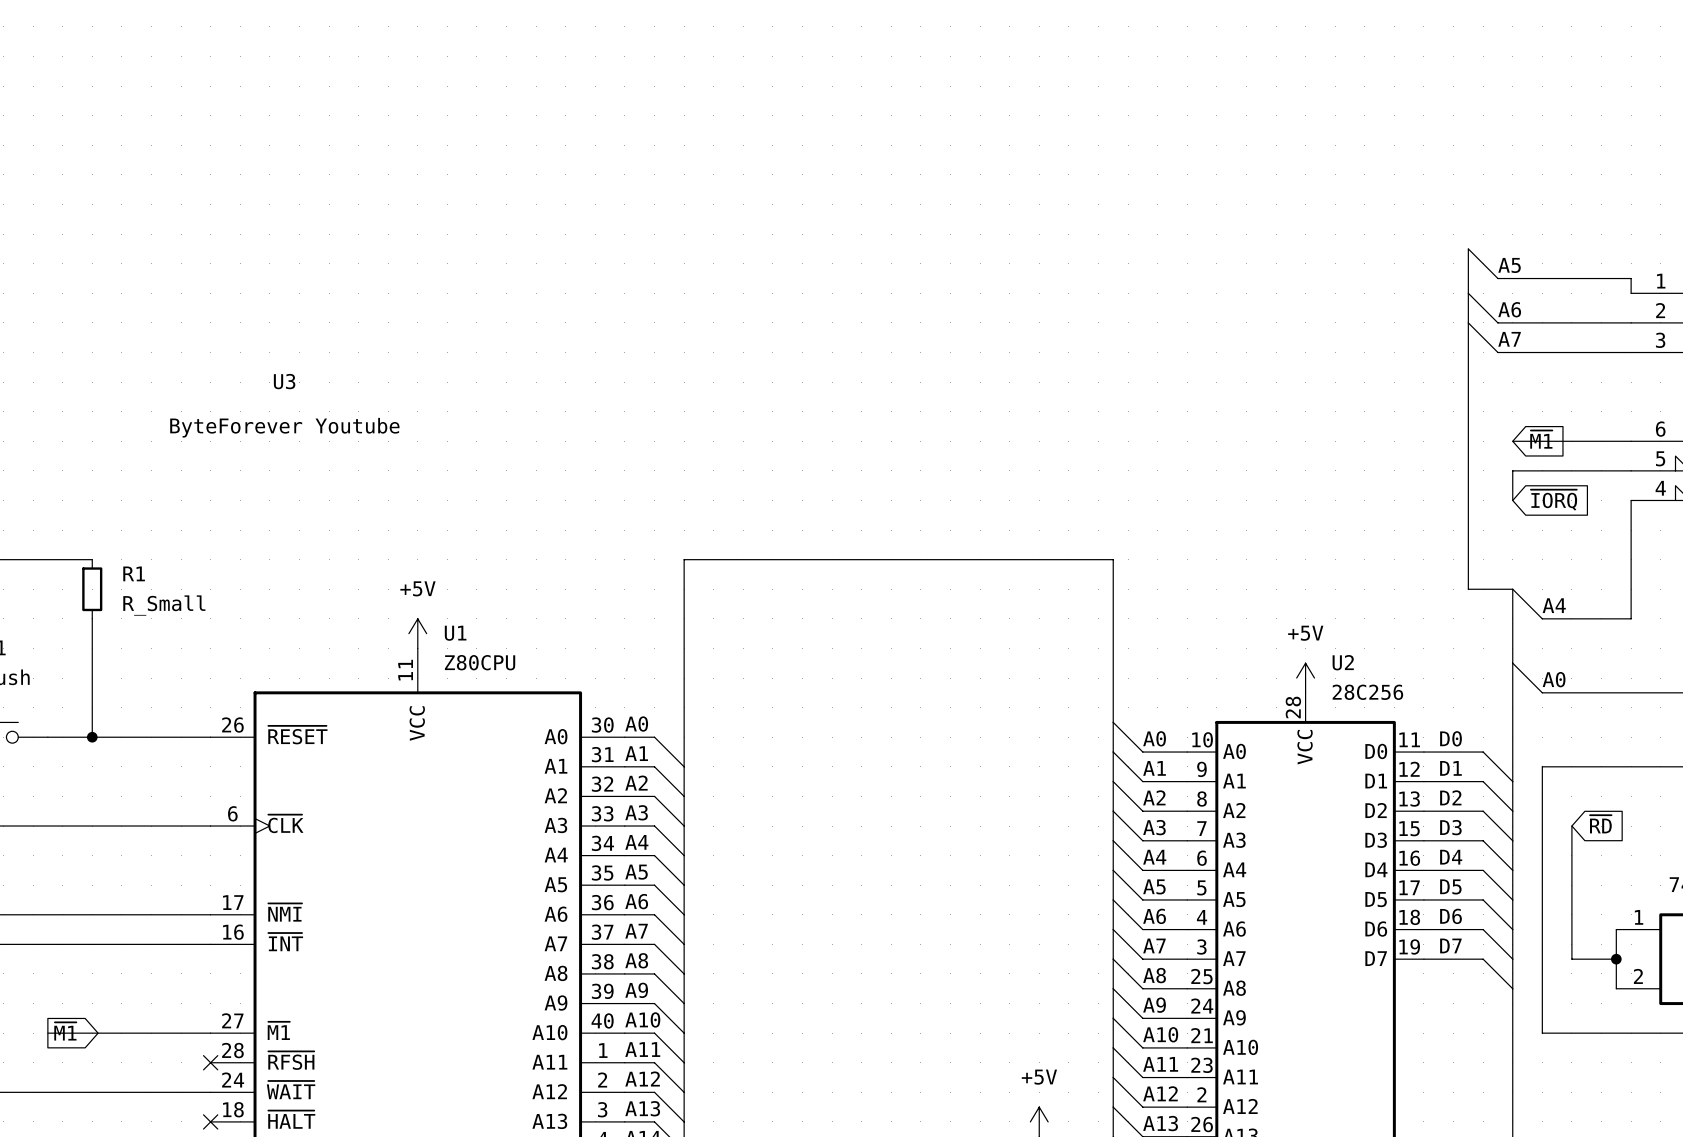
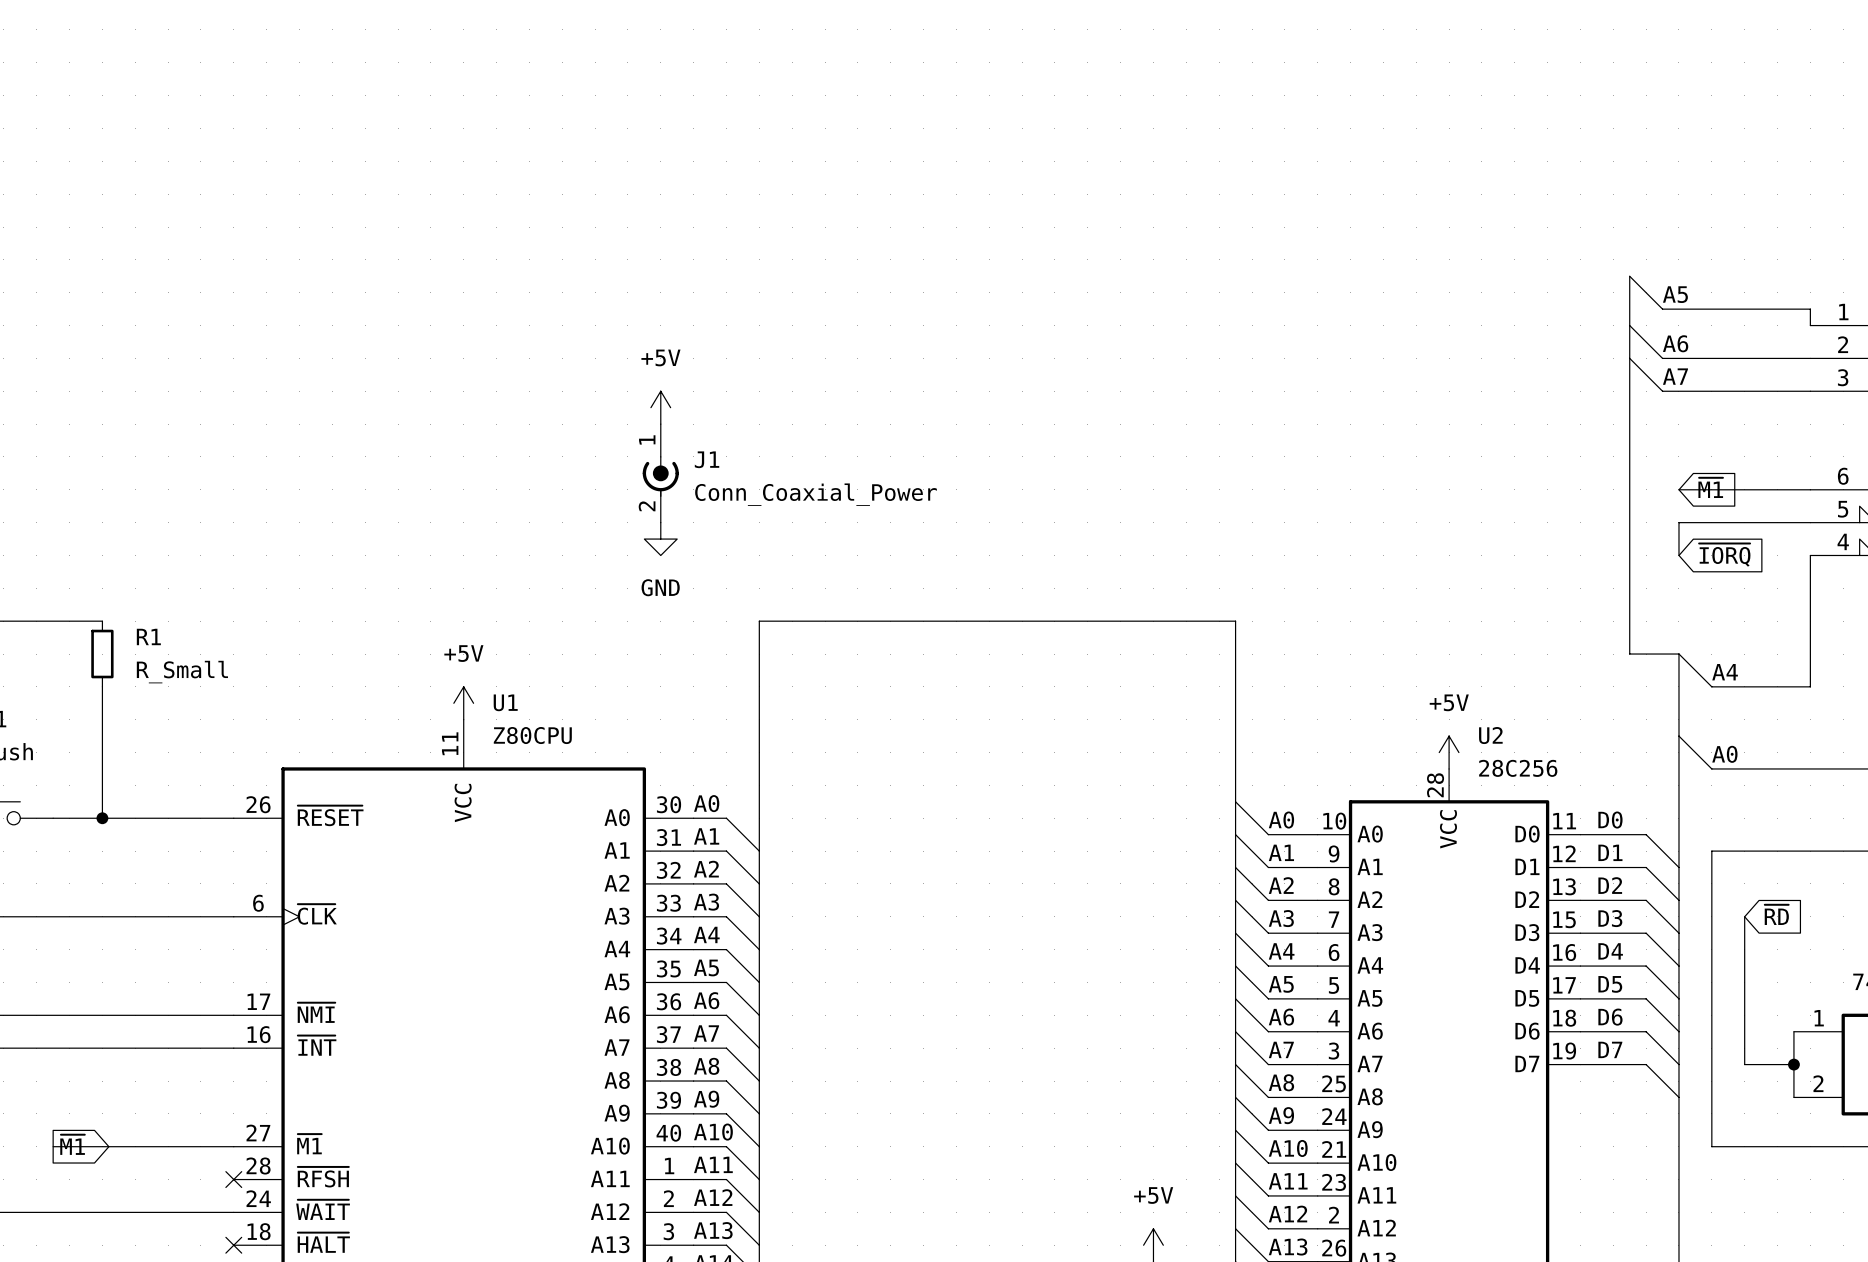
power symbol: none -> +5V (660, 407)
U3: (284, 405) -> none
J1: none -> Conn_Coaxial_Power (660, 473)
power symbol: none -> GND (660, 539)

